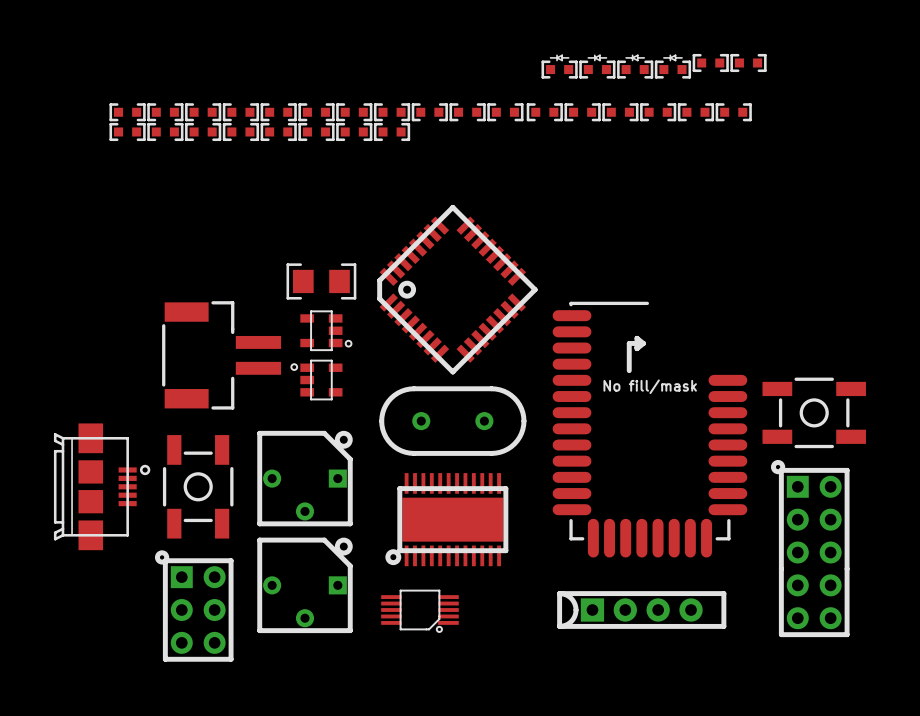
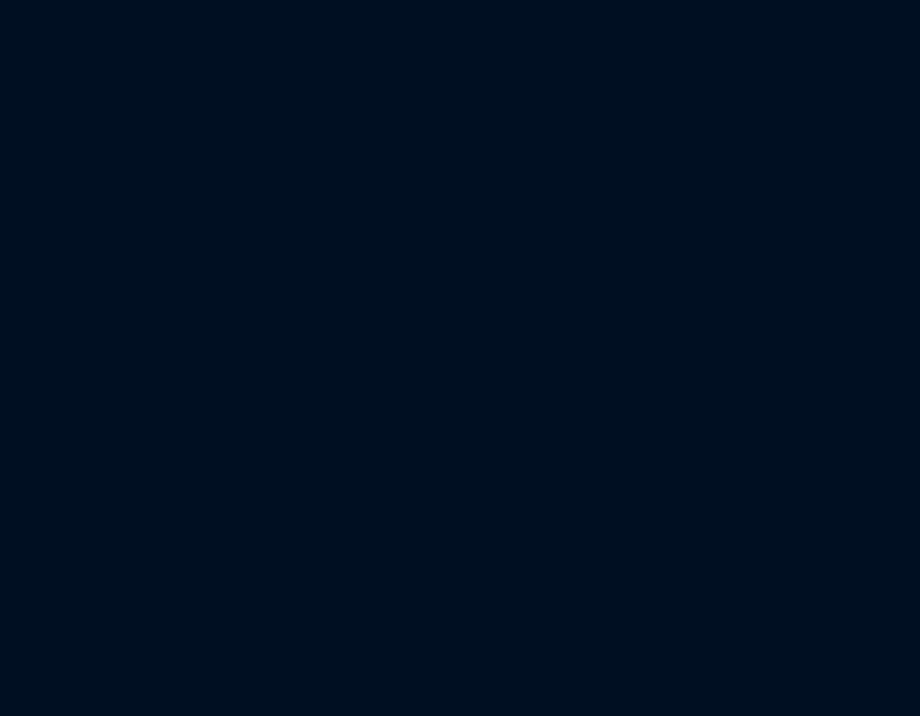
part: (710, 62) -> none
part: (748, 62) -> none
part: (559, 66) -> none
part: (597, 66) -> none
part: (635, 66) -> none
part: (672, 66) -> none
part: (127, 112) -> none
part: (165, 112) -> none
part: (203, 112) -> none
part: (240, 112) -> none
part: (278, 112) -> none
part: (316, 112) -> none
part: (354, 112) -> none
part: (392, 112) -> none
part: (429, 112) -> none
part: (467, 112) -> none
part: (505, 112) -> none
part: (544, 112) -> none
part: (582, 112) -> none
part: (620, 112) -> none
part: (658, 112) -> none
part: (695, 112) -> none
part: (733, 112) -> none
part: (127, 131) -> none
part: (165, 131) -> none
part: (203, 131) -> none
part: (240, 131) -> none
part: (278, 131) -> none
part: (316, 131) -> none
part: (354, 131) -> none
part: (392, 131) -> none
part: (321, 281) -> none
part: (457, 289) -> none
part: (326, 330) -> none
part: (221, 355) -> none
part: (316, 380) -> none
part: (814, 412) -> none
part: (452, 421) -> none
part: (649, 429) -> none
part: (304, 478) -> none
part: (102, 486) -> none
part: (198, 486) -> none
part: (446, 519) -> none
part: (810, 548) -> none
part: (304, 585) -> none
part: (194, 606) -> none
part: (641, 610) -> none
part: (419, 611) -> none

